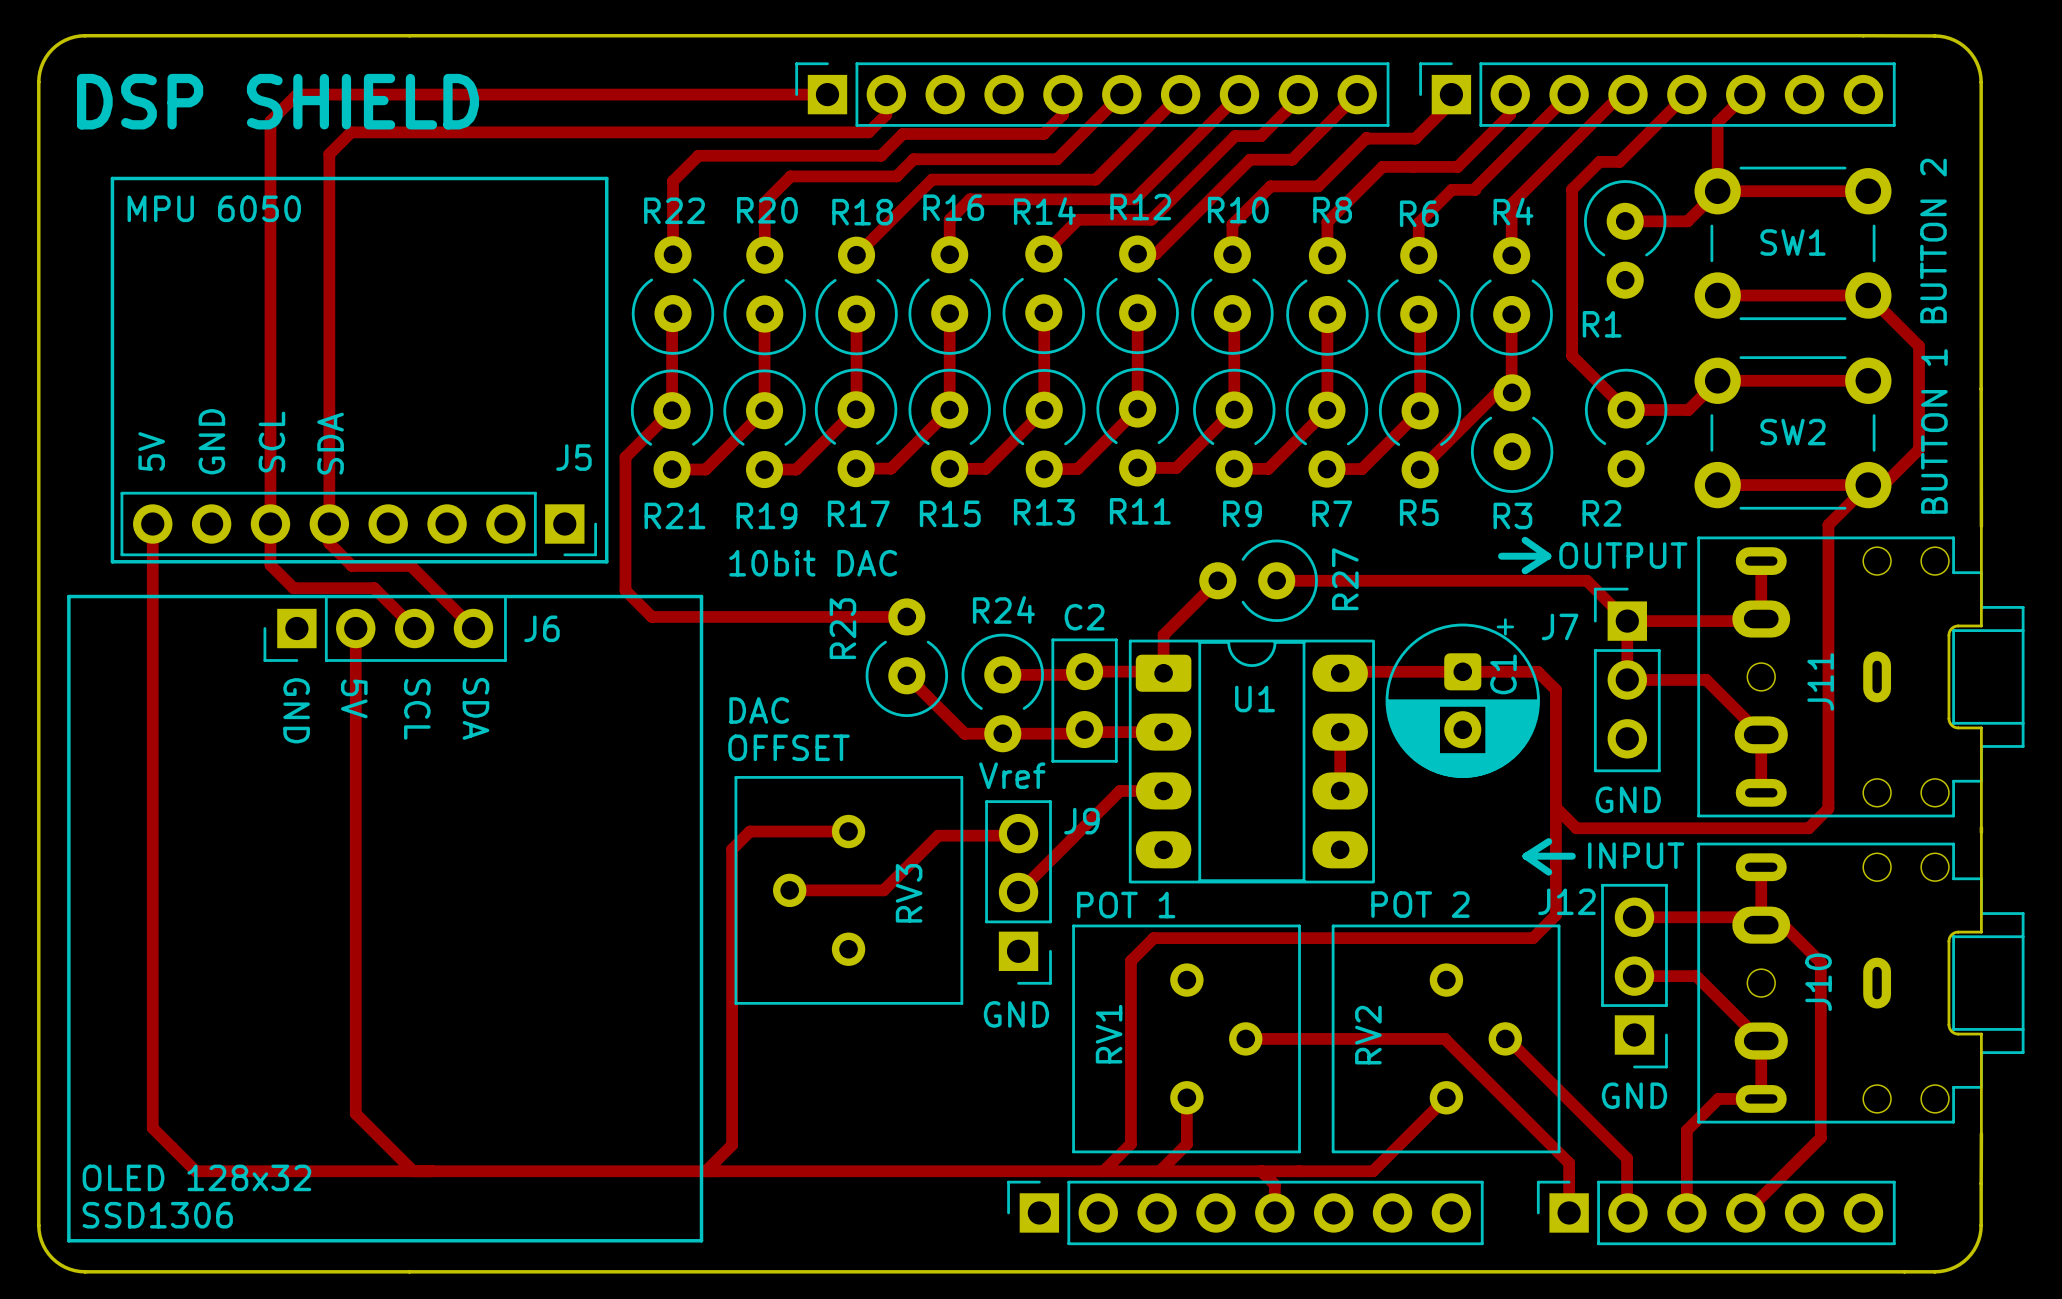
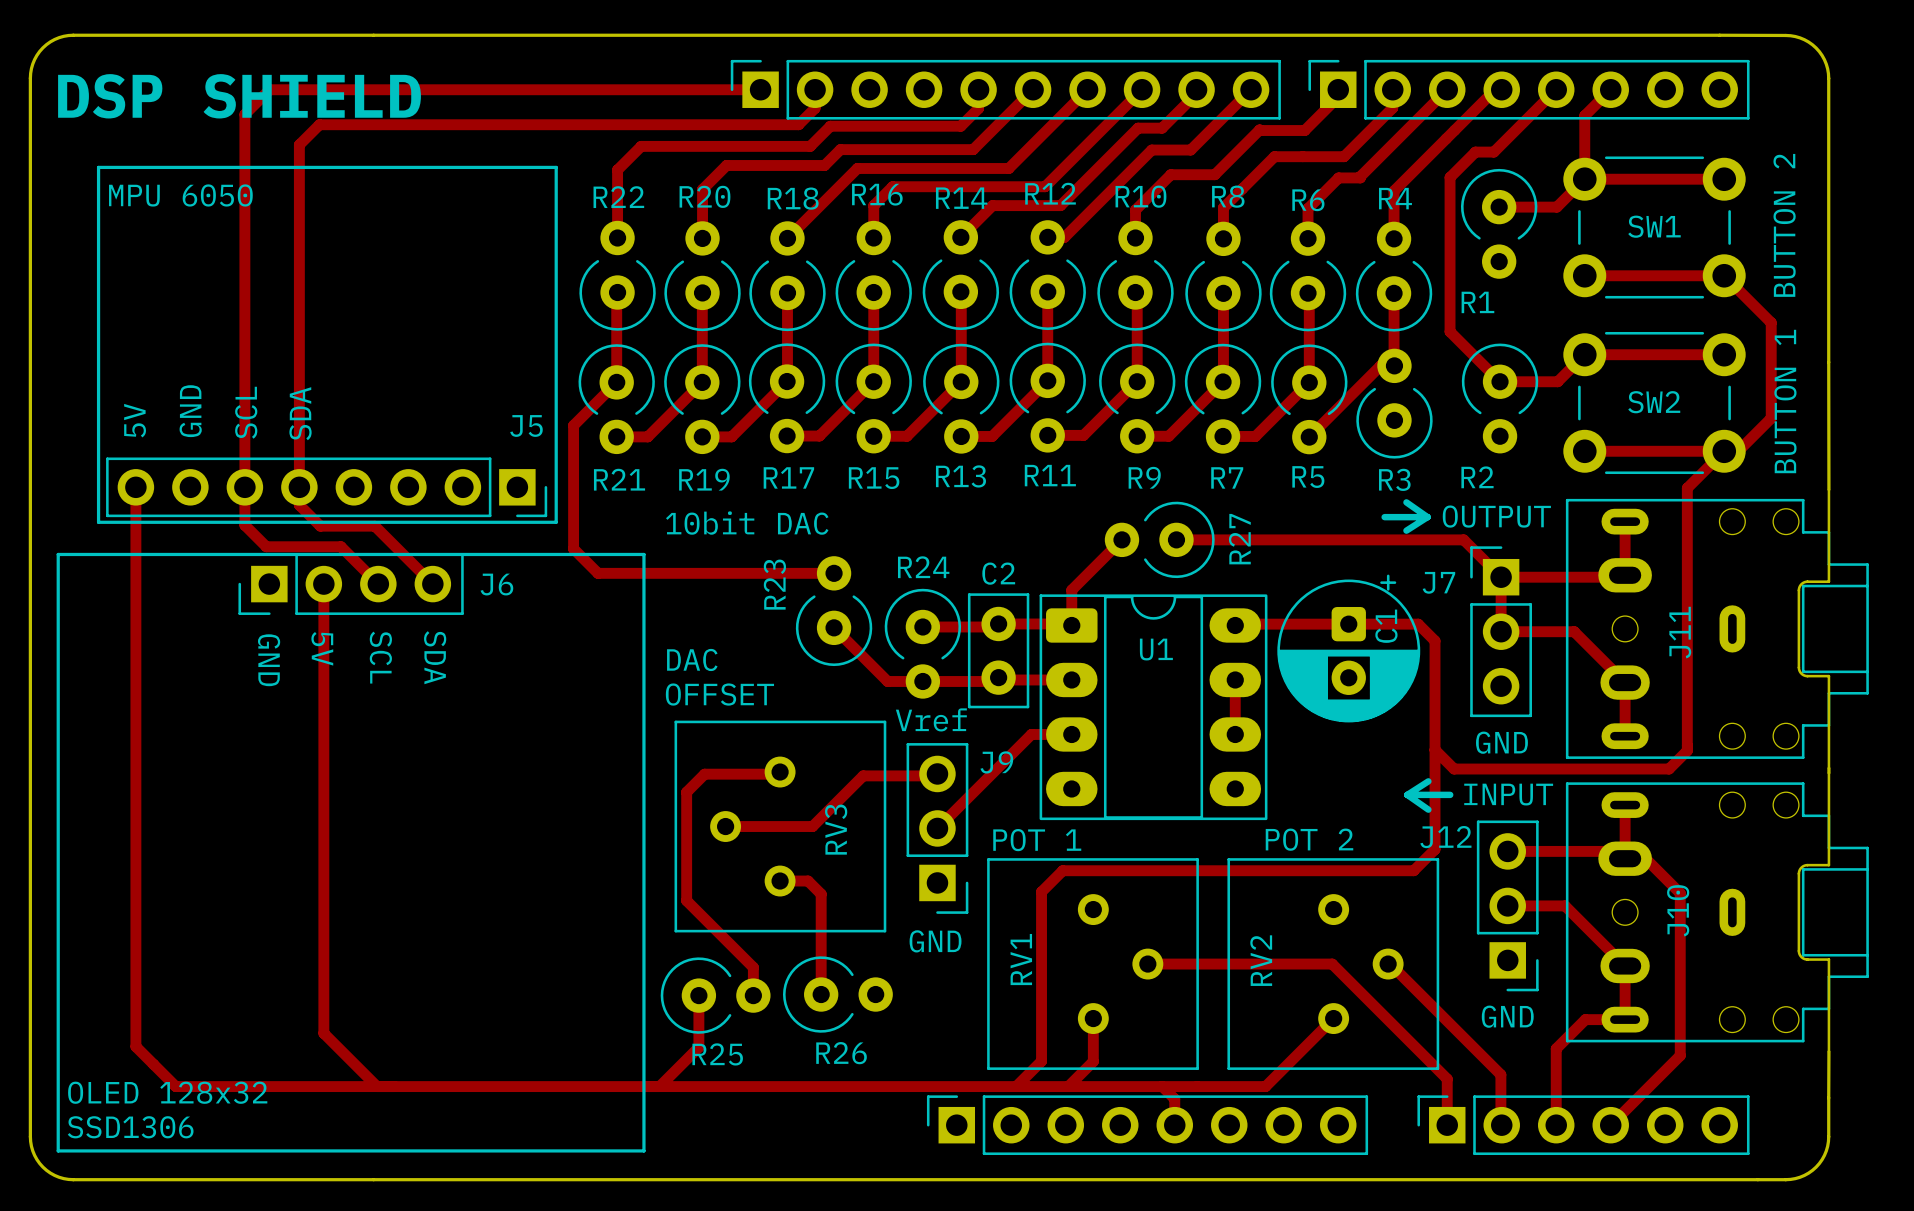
top track: (848, 831) (749, 831) (732, 849) (732, 1145) (705, 1171) -> (780, 772) (777, 774) (704, 774) (686, 792) (686, 900) (753, 967) (753, 995)
top track: none -> (780, 881) (808, 881) (821, 894) (821, 994)
R26: none -> (837, 994)
top track: none -> (698, 995) (698, 1047) (659, 1086)
R25: none -> (715, 995)

